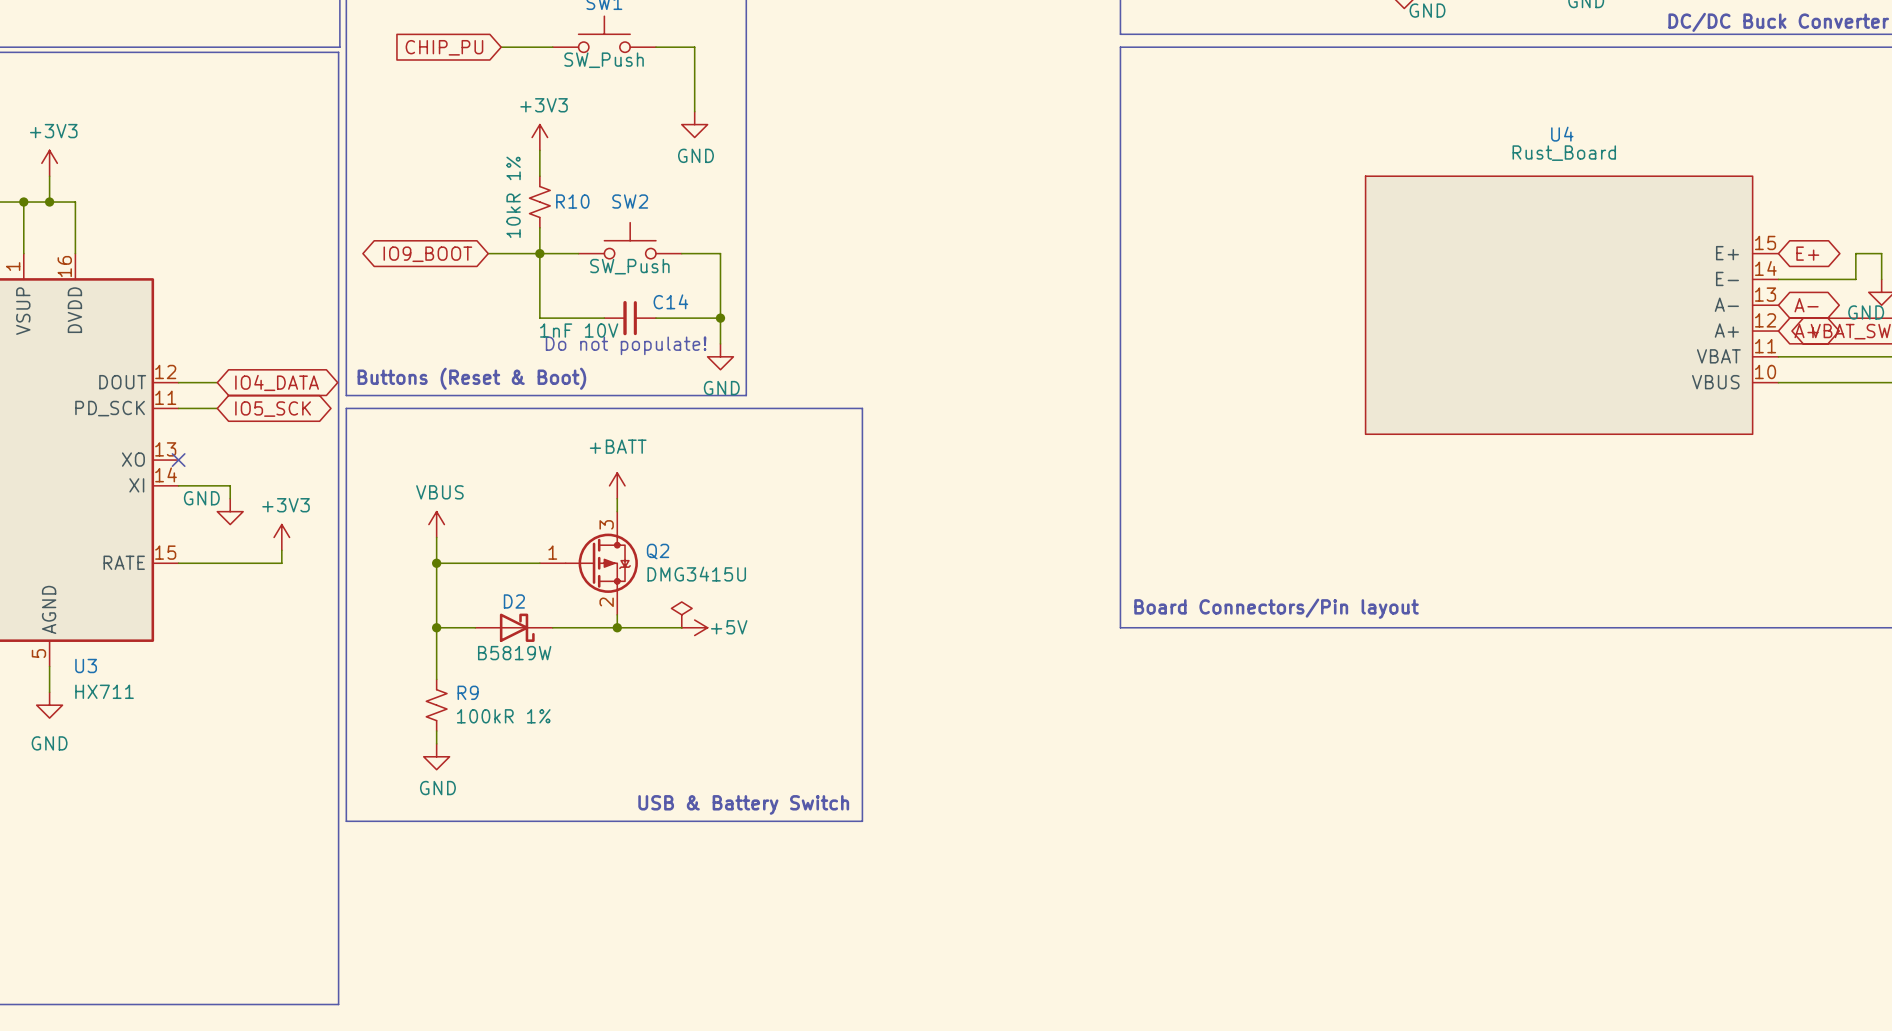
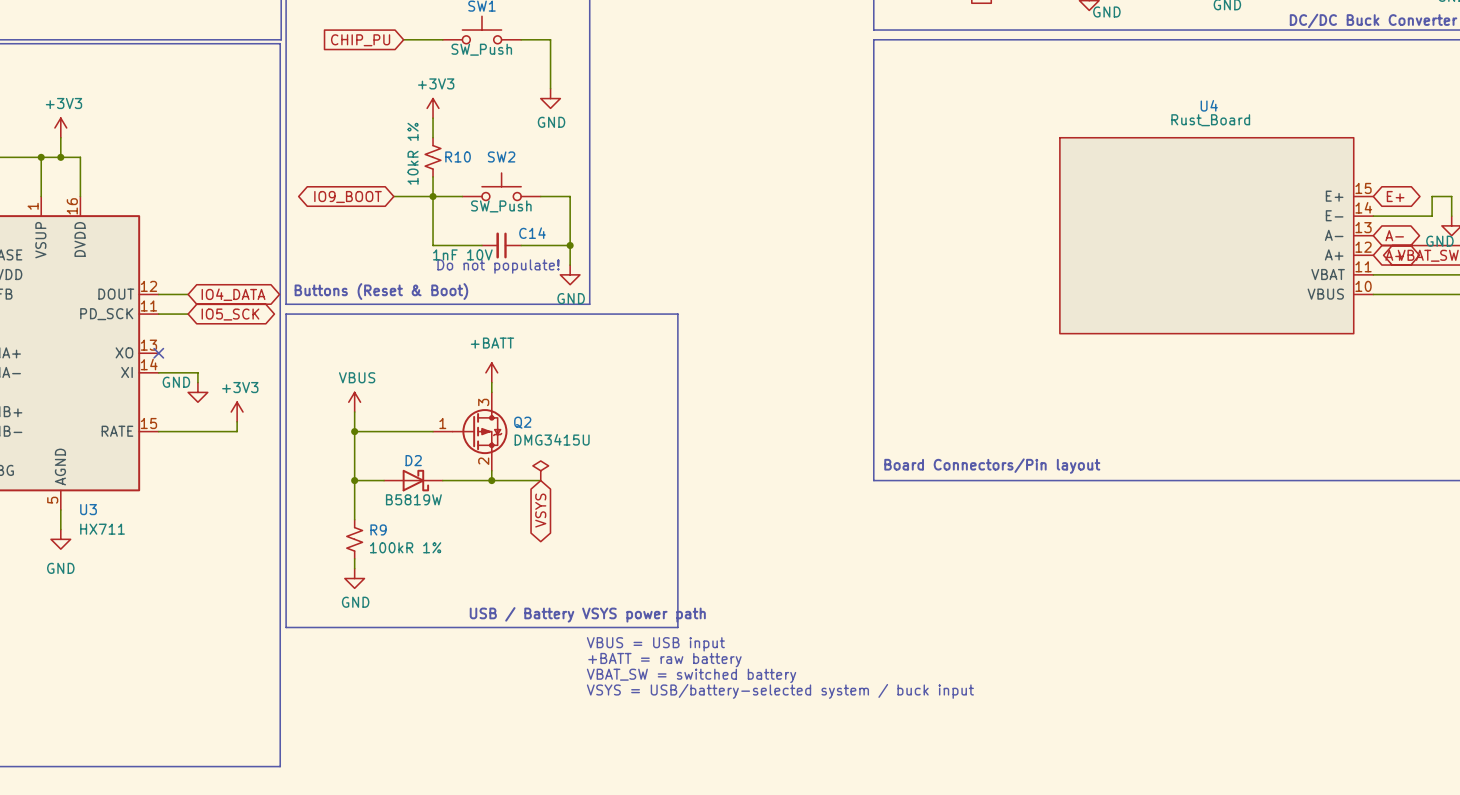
power symbol: +5V (694, 627) -> none
global label: none -> VSYS (540, 510)
text: USB & Battery Switch (743, 804) -> USB / Battery VSYS power path (587, 614)
text: none -> VBUS = USB input (655, 644)
text: none -> +BATT = raw battery (664, 660)
text: none -> VBAT_SW = switched battery (691, 675)
text: none -> VSYS = USB/battery-selected system / buck input (780, 691)

